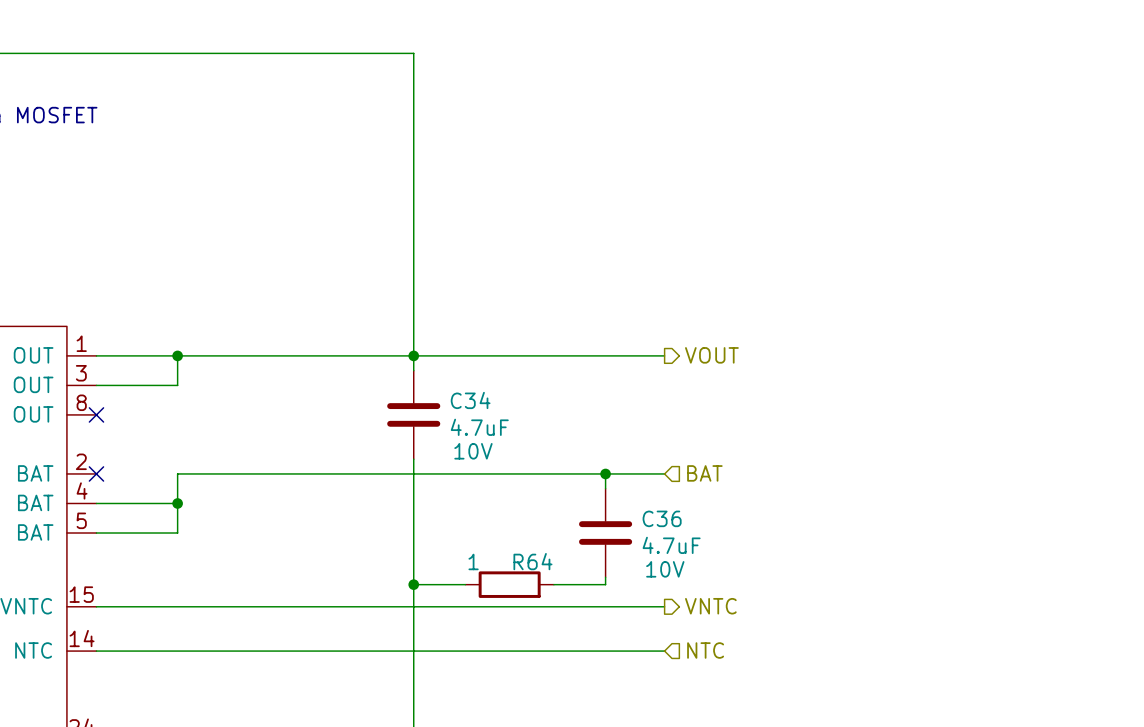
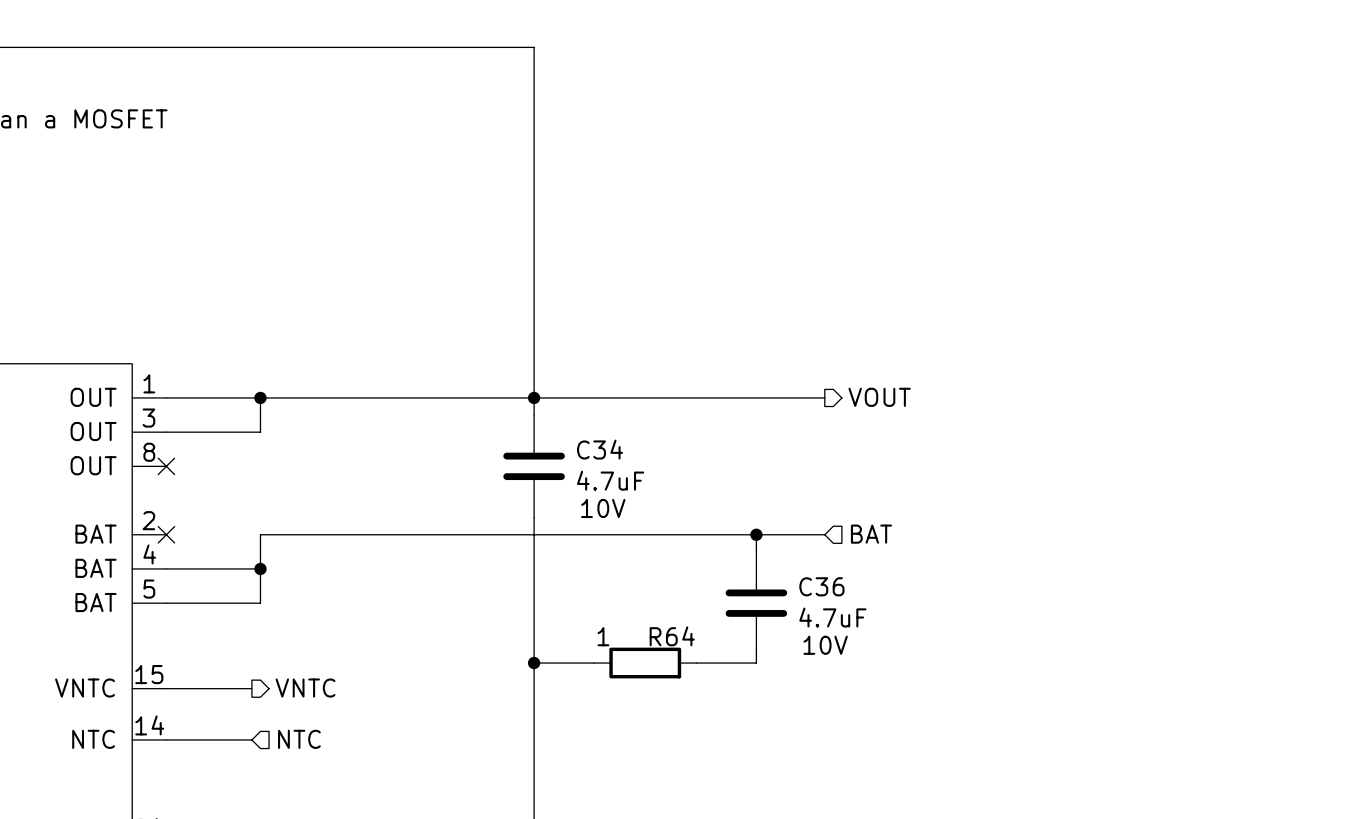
wire: (170, 606) (664, 606) -> none
hierarchical label: none -> VNTC (305, 688)
hierarchical label: VNTC (710, 606) -> none
hierarchical label: none -> NTC (299, 739)
hierarchical label: NTC (705, 650) -> none
wire: (170, 651) (664, 651) -> none

